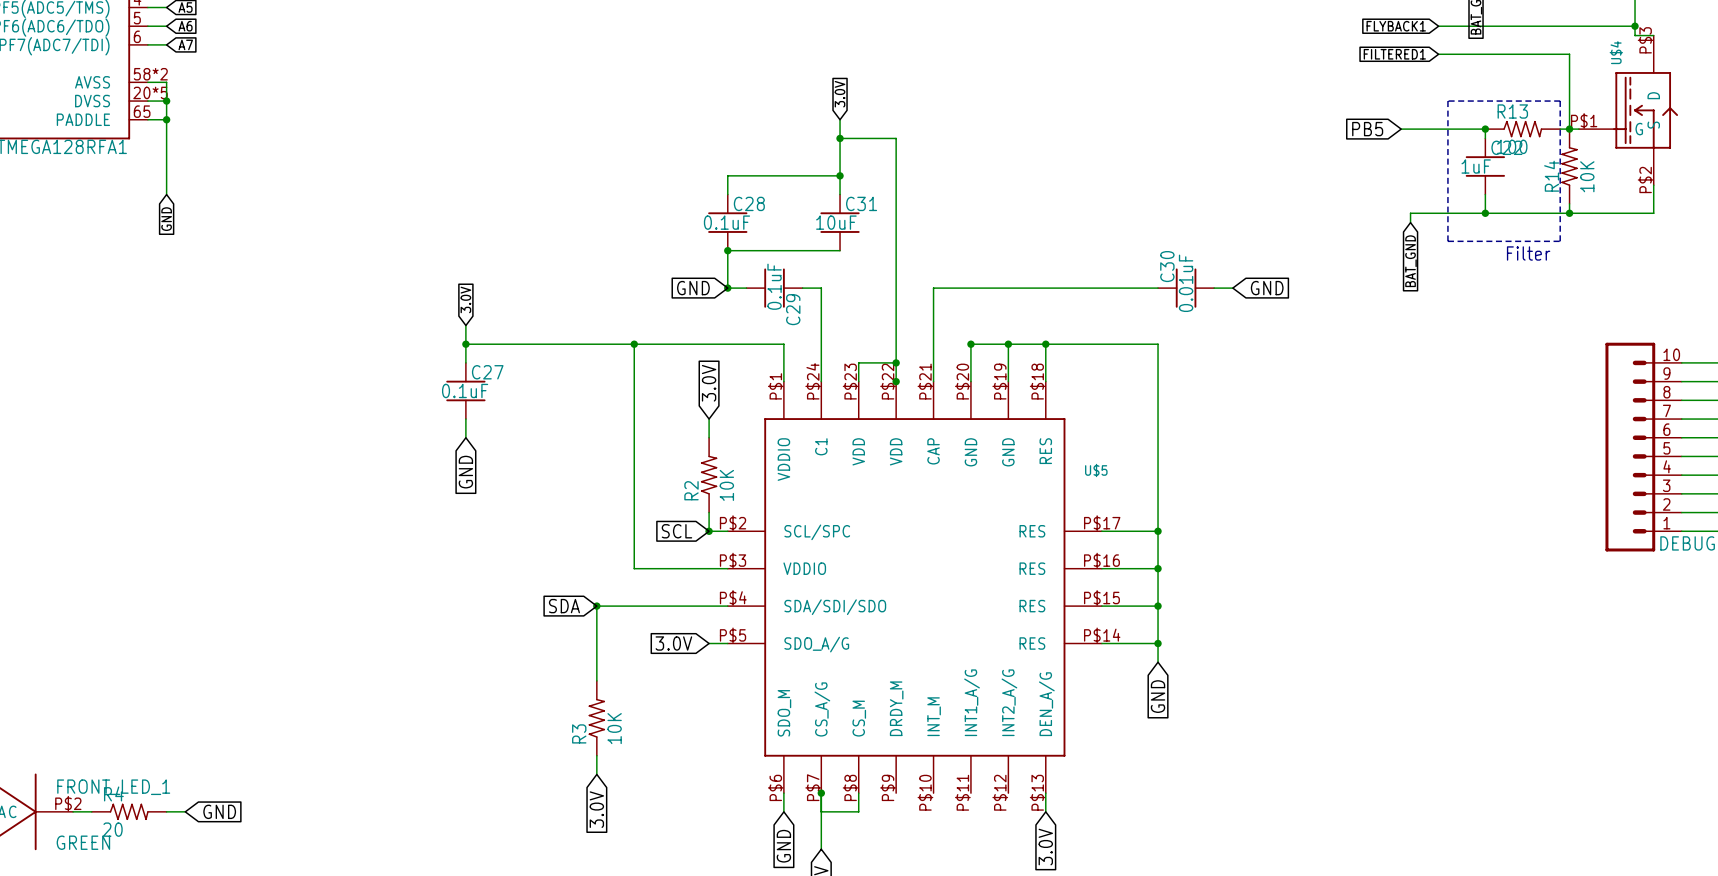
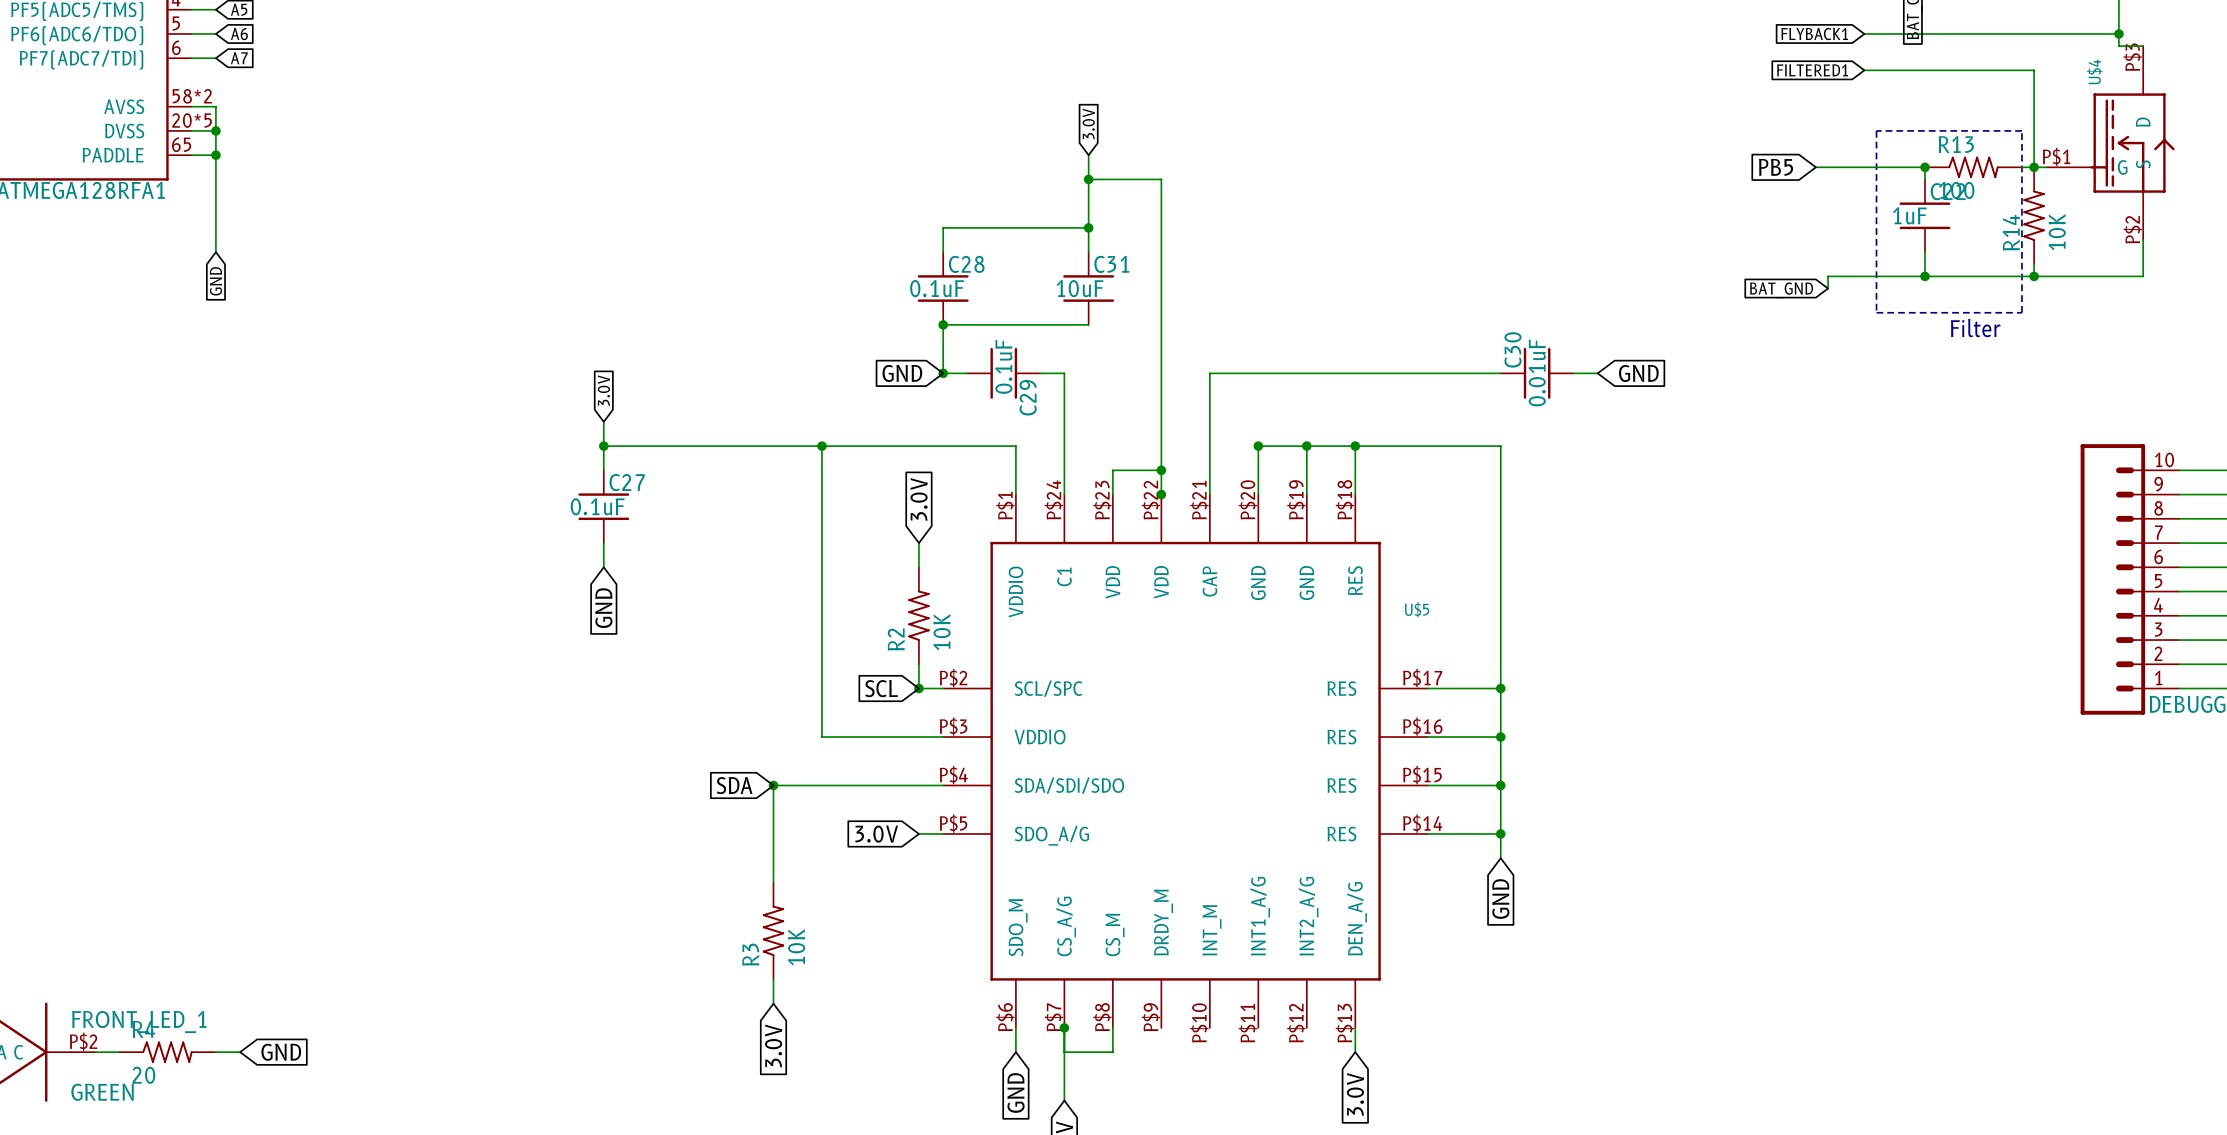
global label rotation: 0° (1410, 261) -> 90° clockwise (1781, 290)

